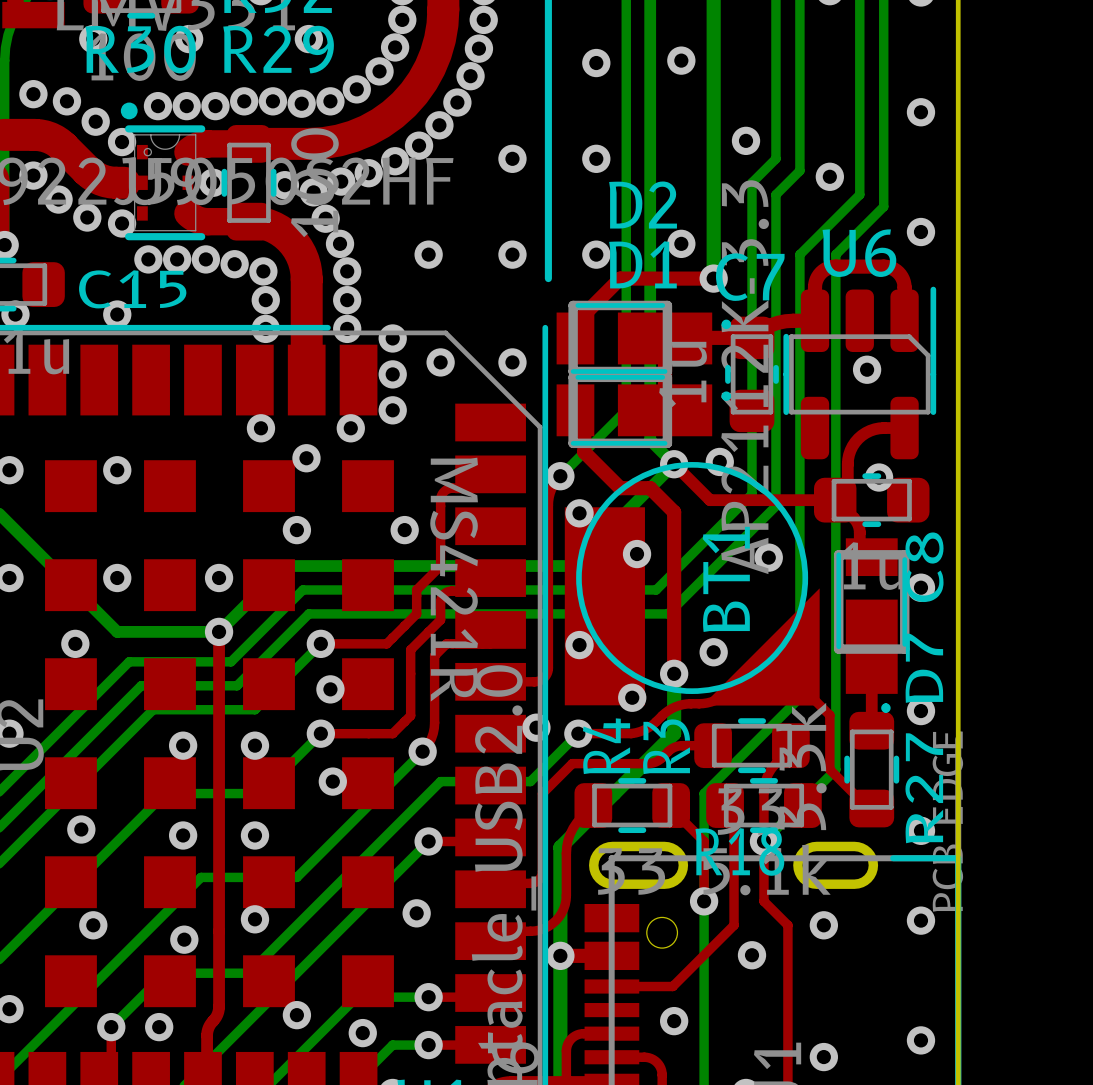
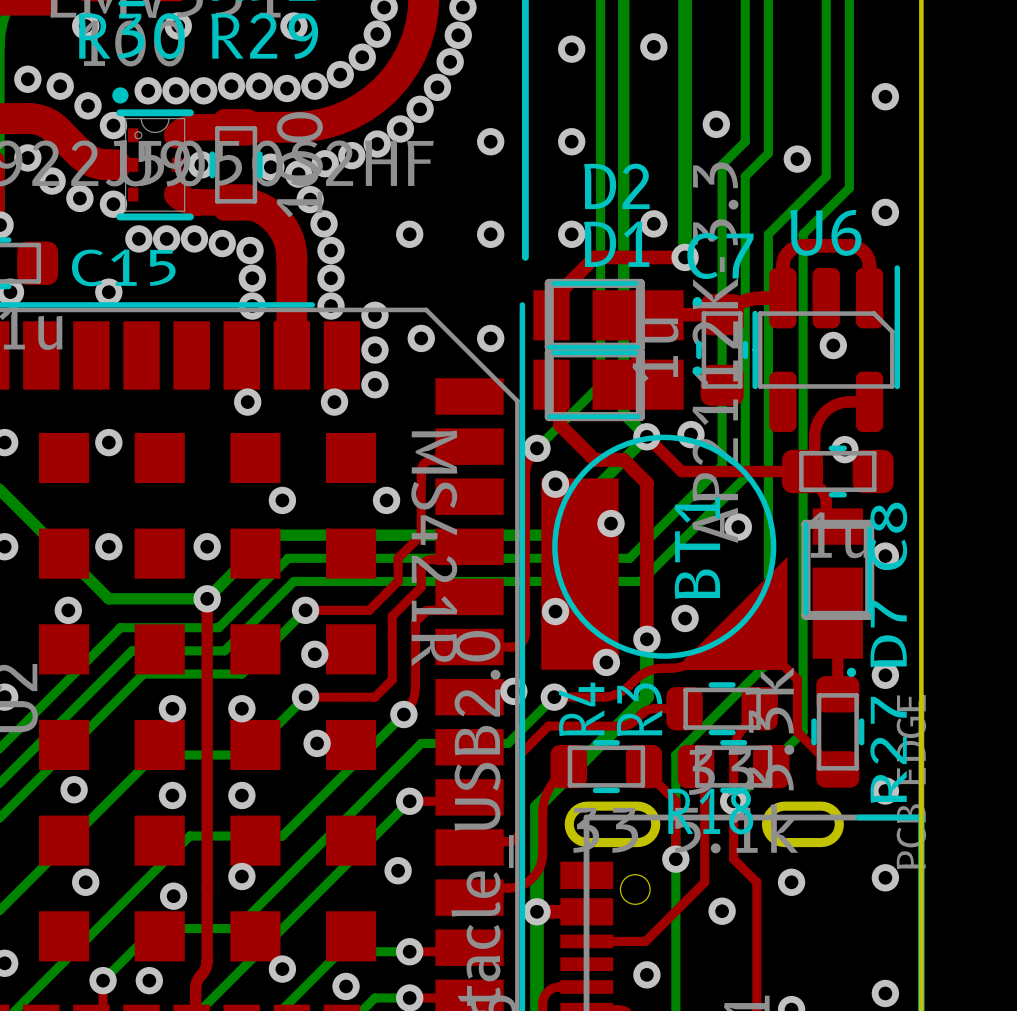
via: (306, 458) -> none

